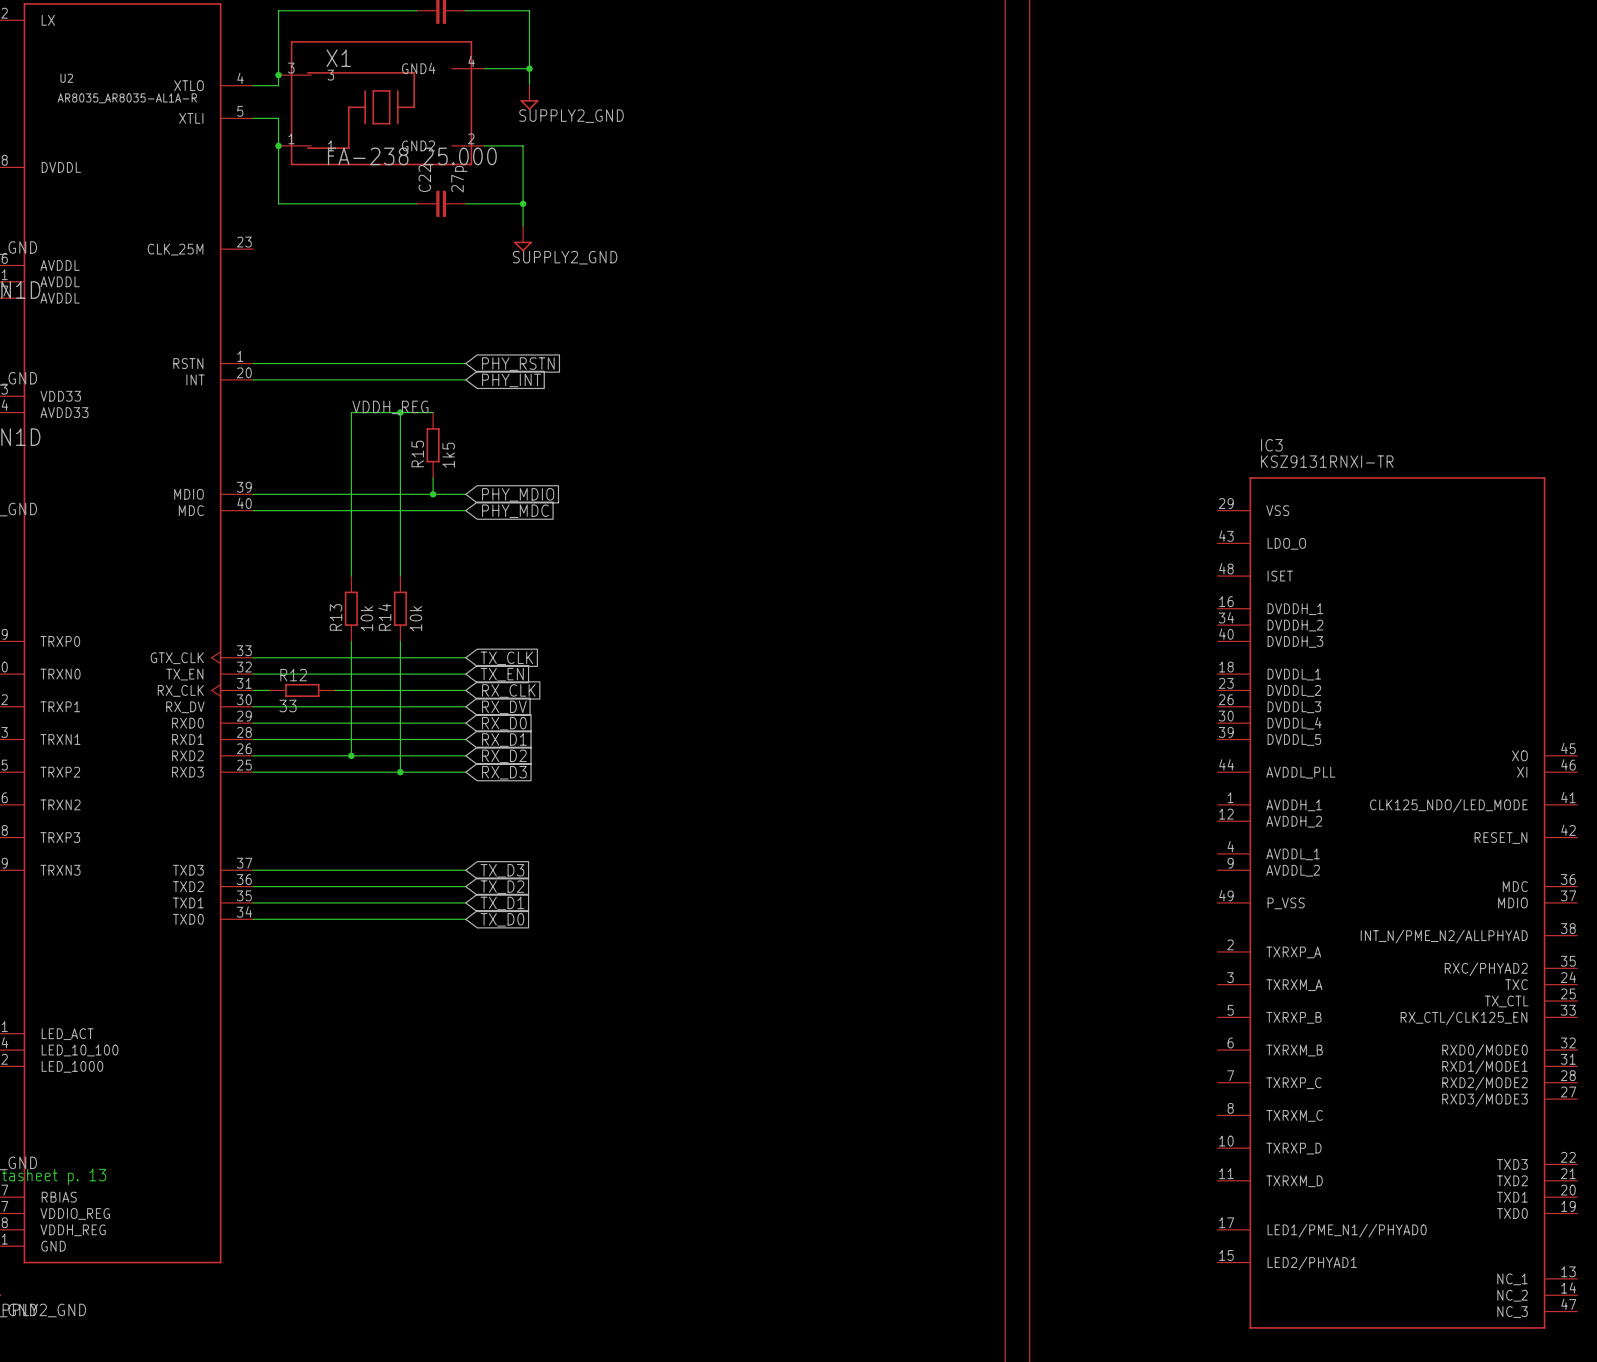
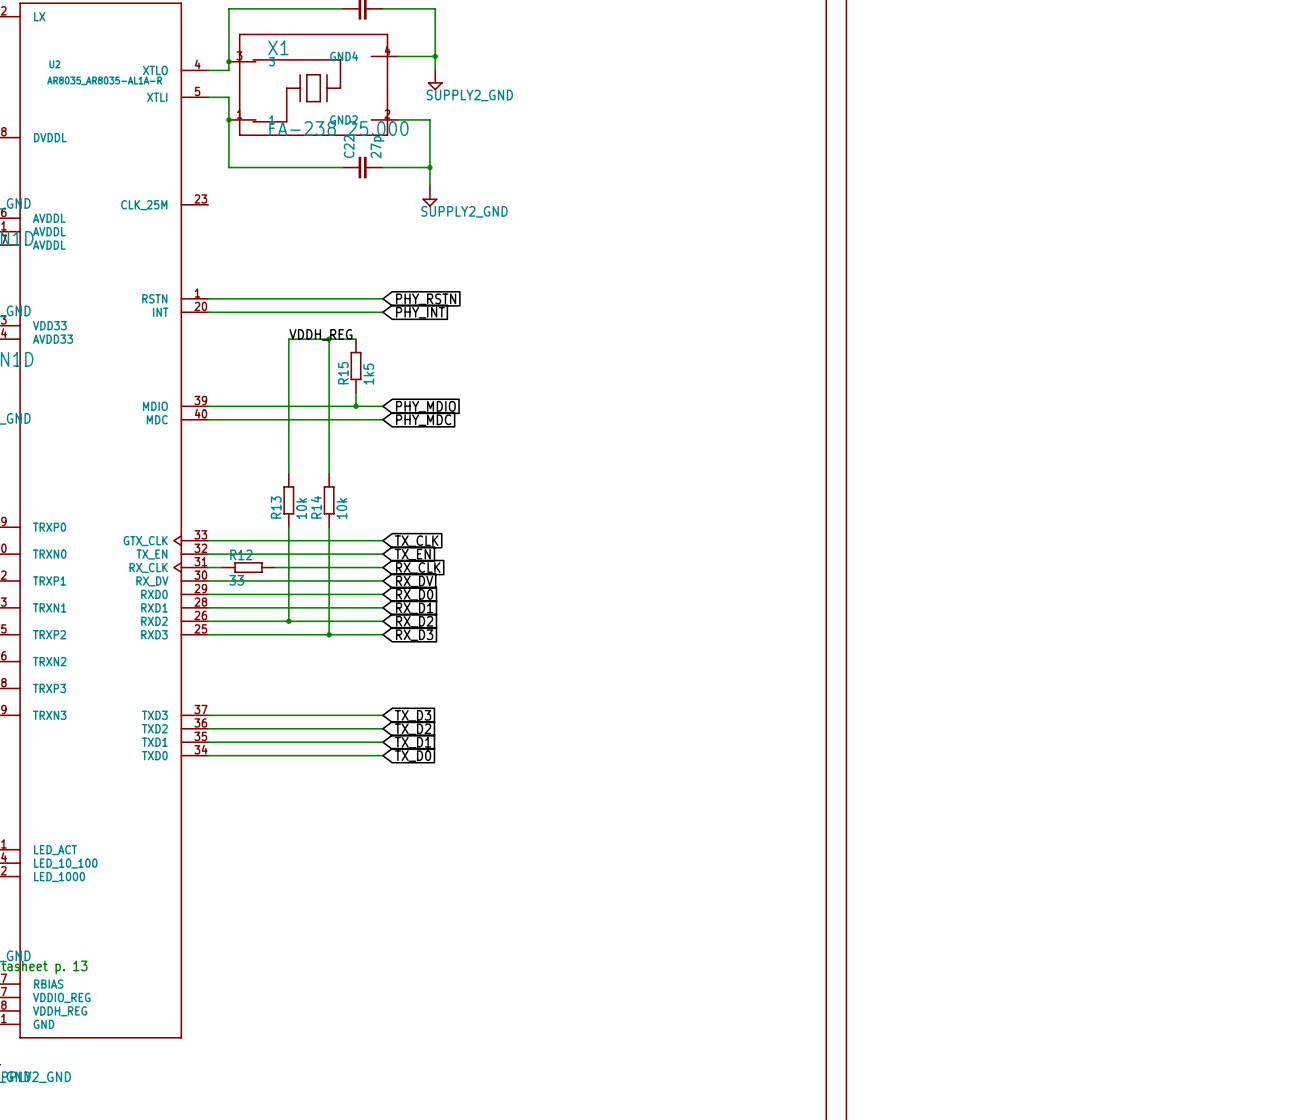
IC3: KSZ9131RNXI-TR (1397, 902) -> none

